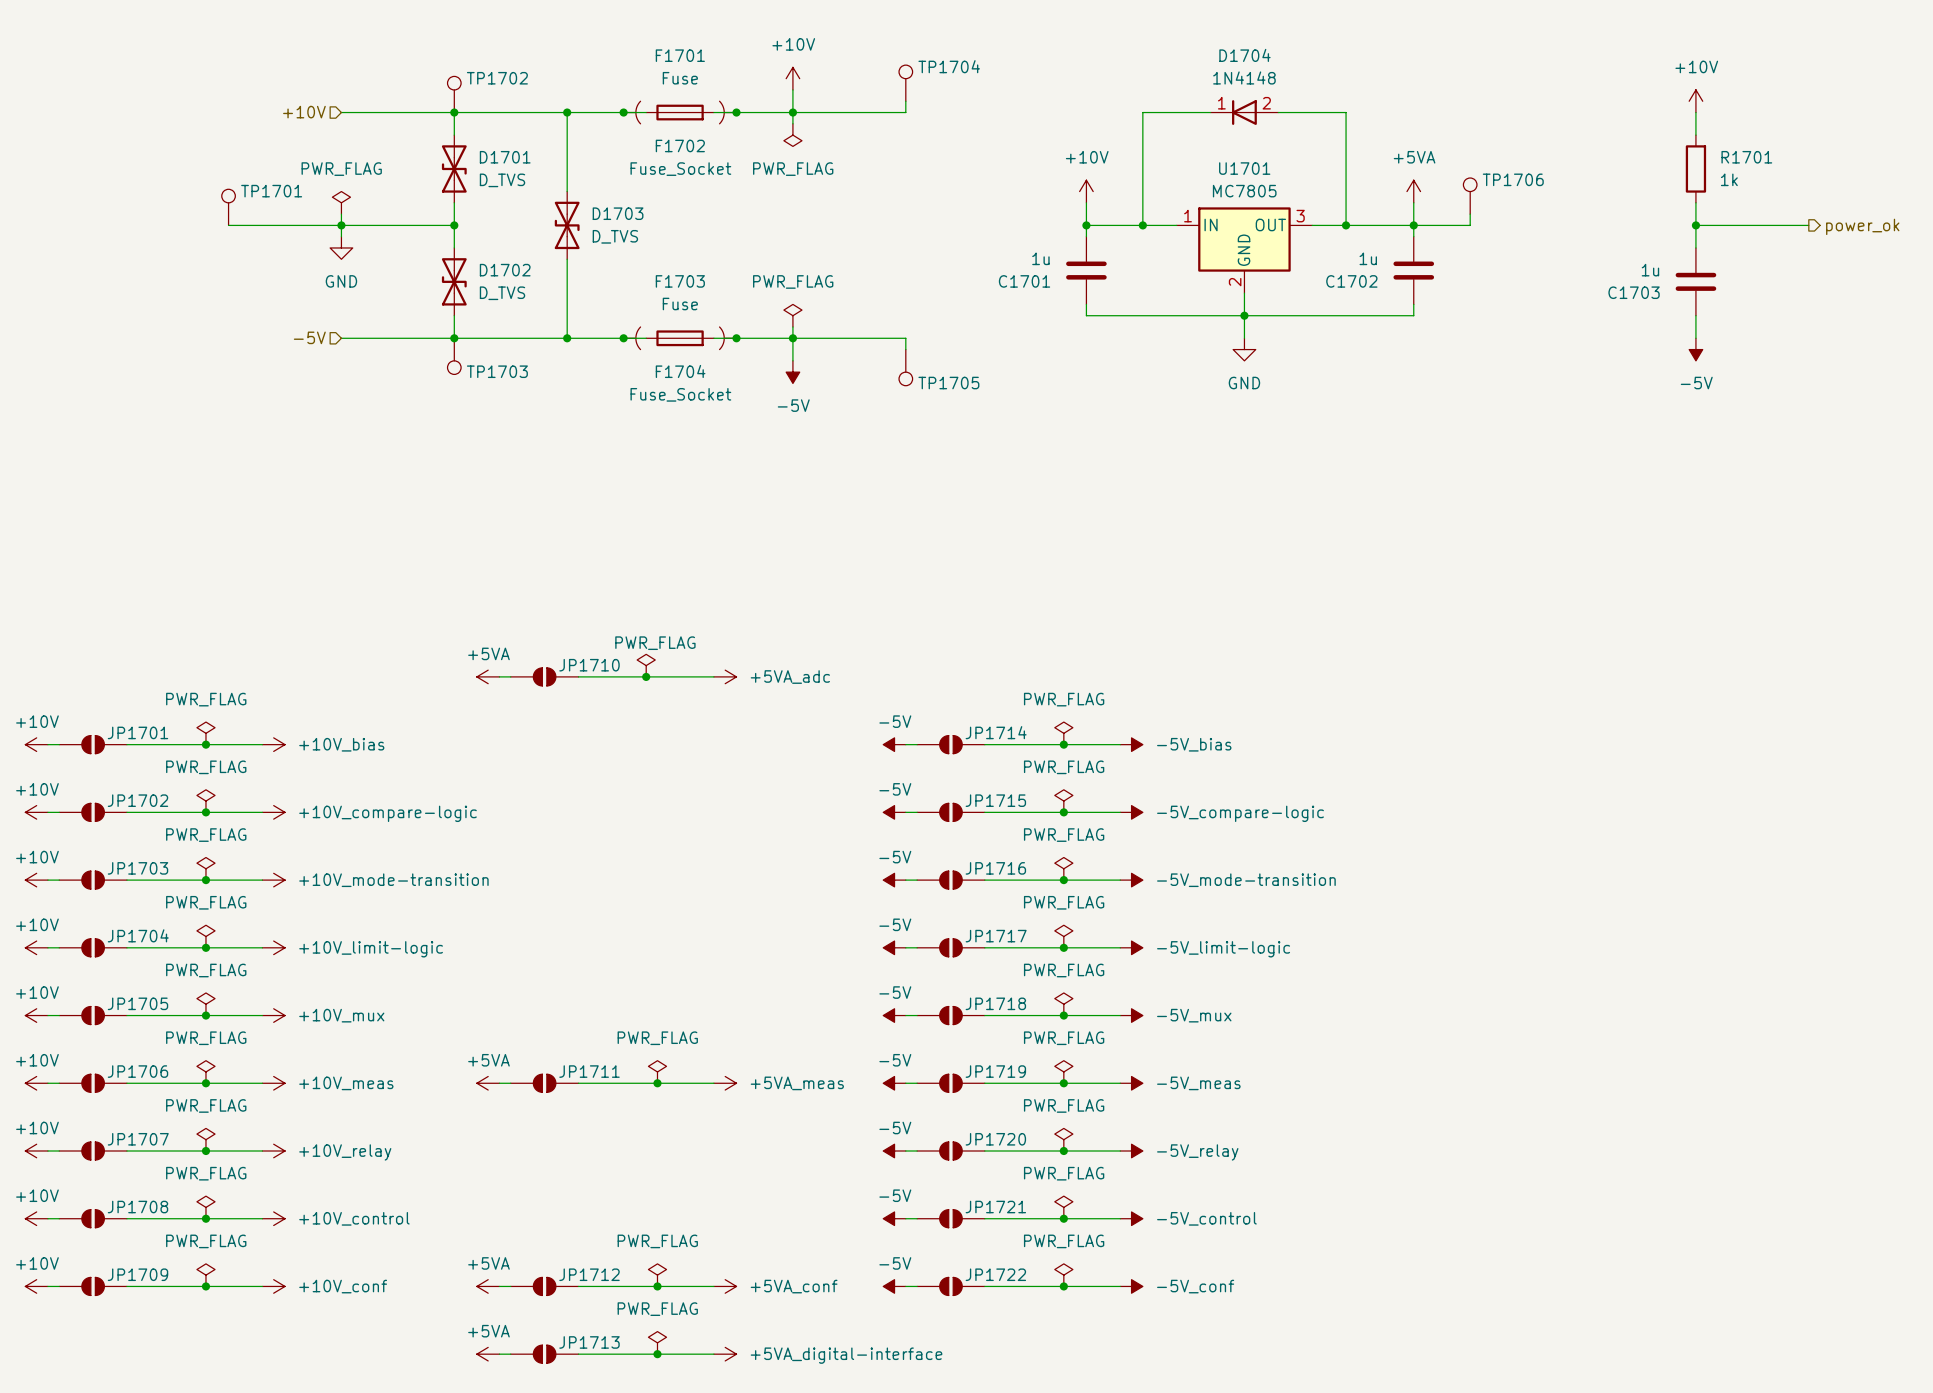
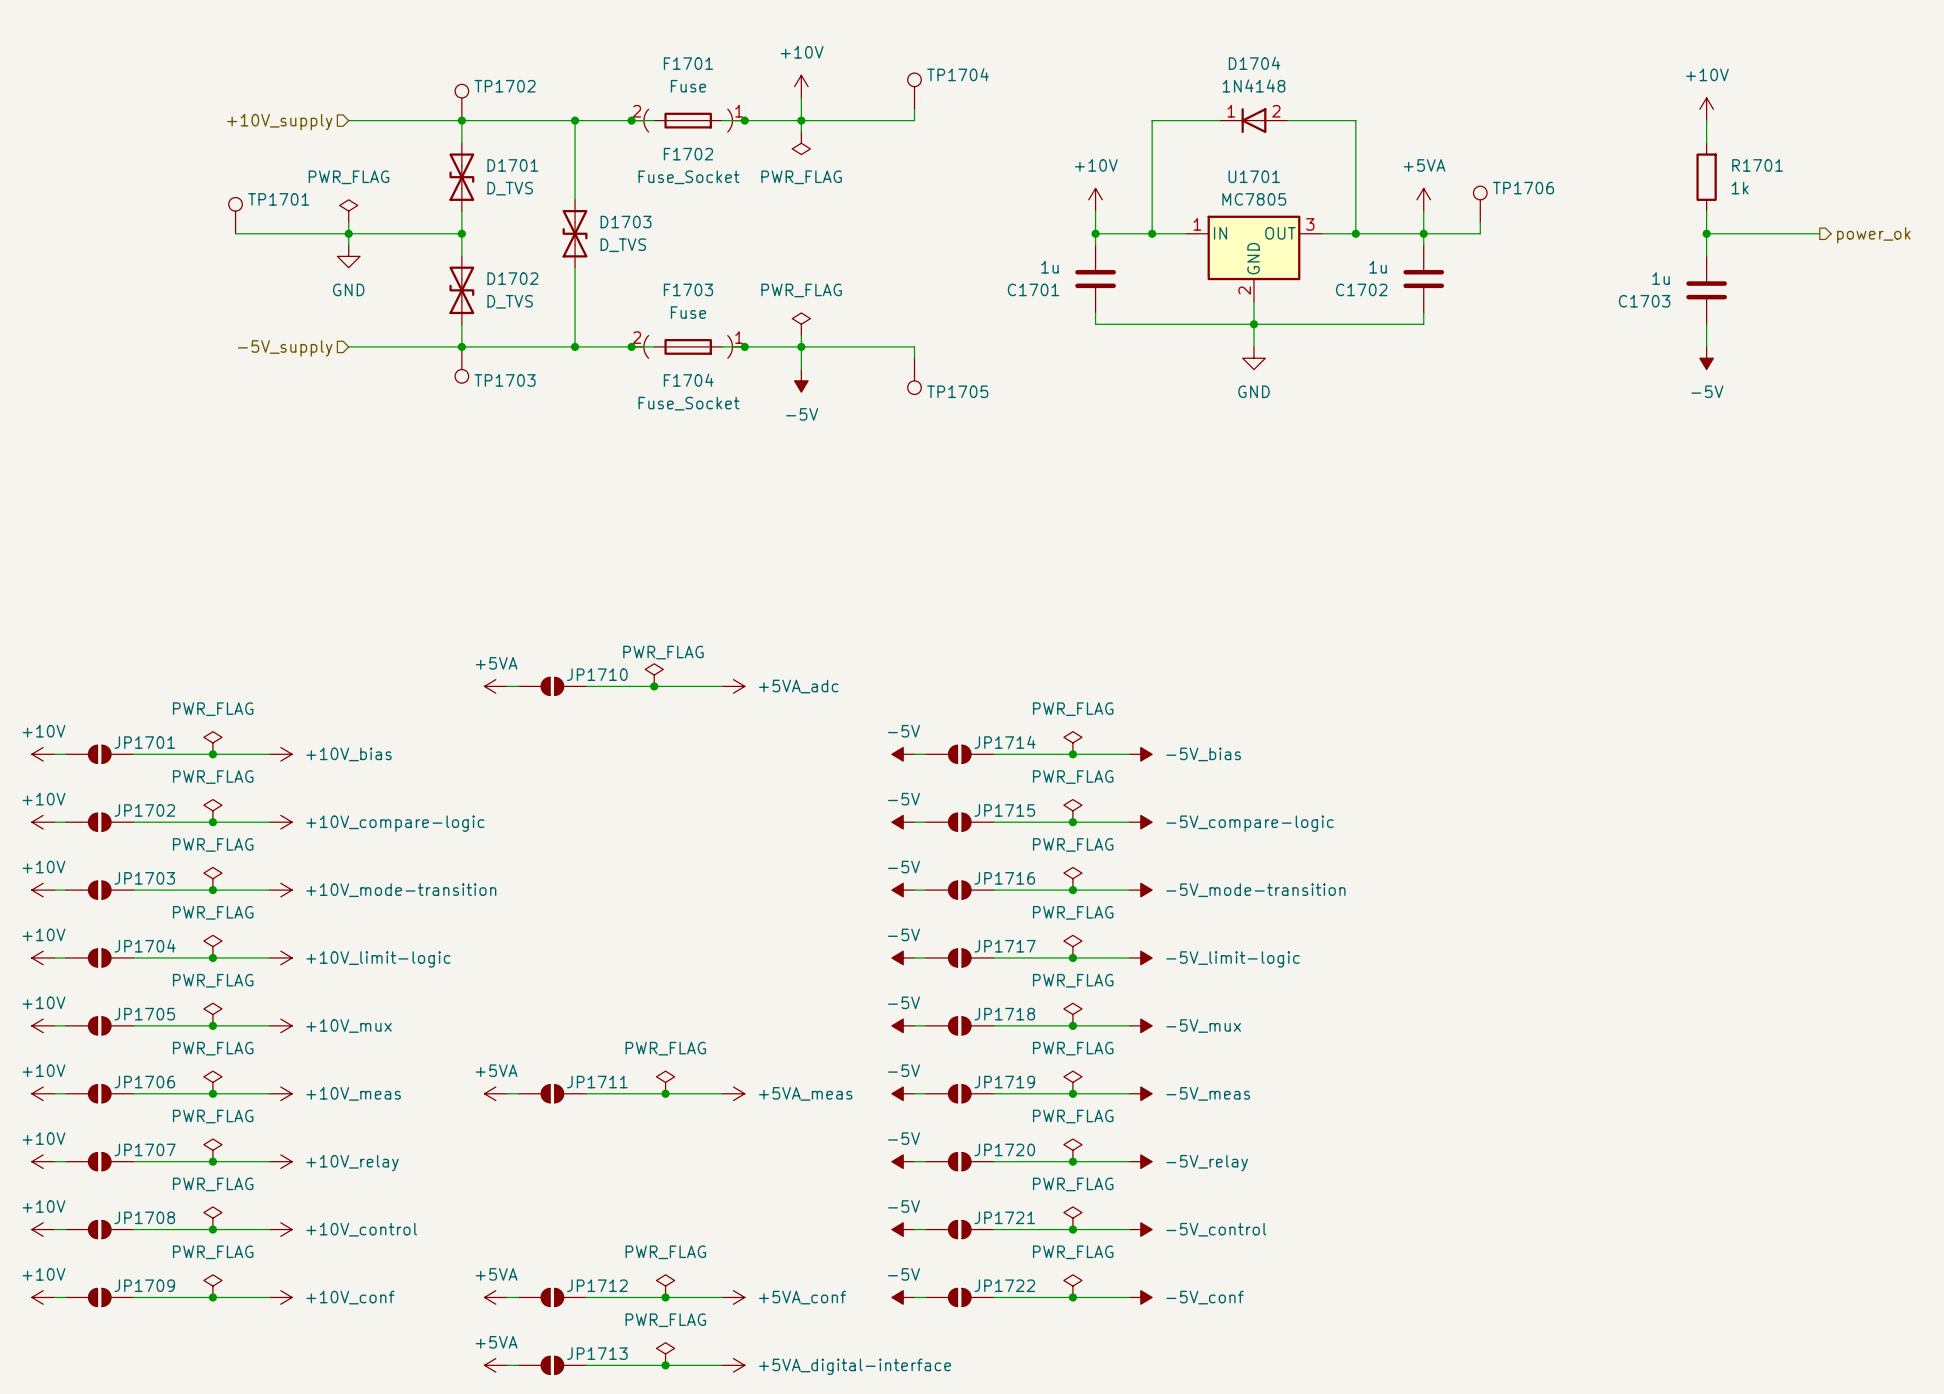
F1702 pin number: none -> 2 (637, 111)
F1702 pin number: none -> 1 (739, 111)
hierarchical label: +10V (304, 112) -> +10V_supply (279, 122)
F1704 pin number: none -> 2 (637, 337)
F1704 pin number: none -> 1 (739, 337)
hierarchical label: -5V (309, 337) -> -5V_supply (285, 348)

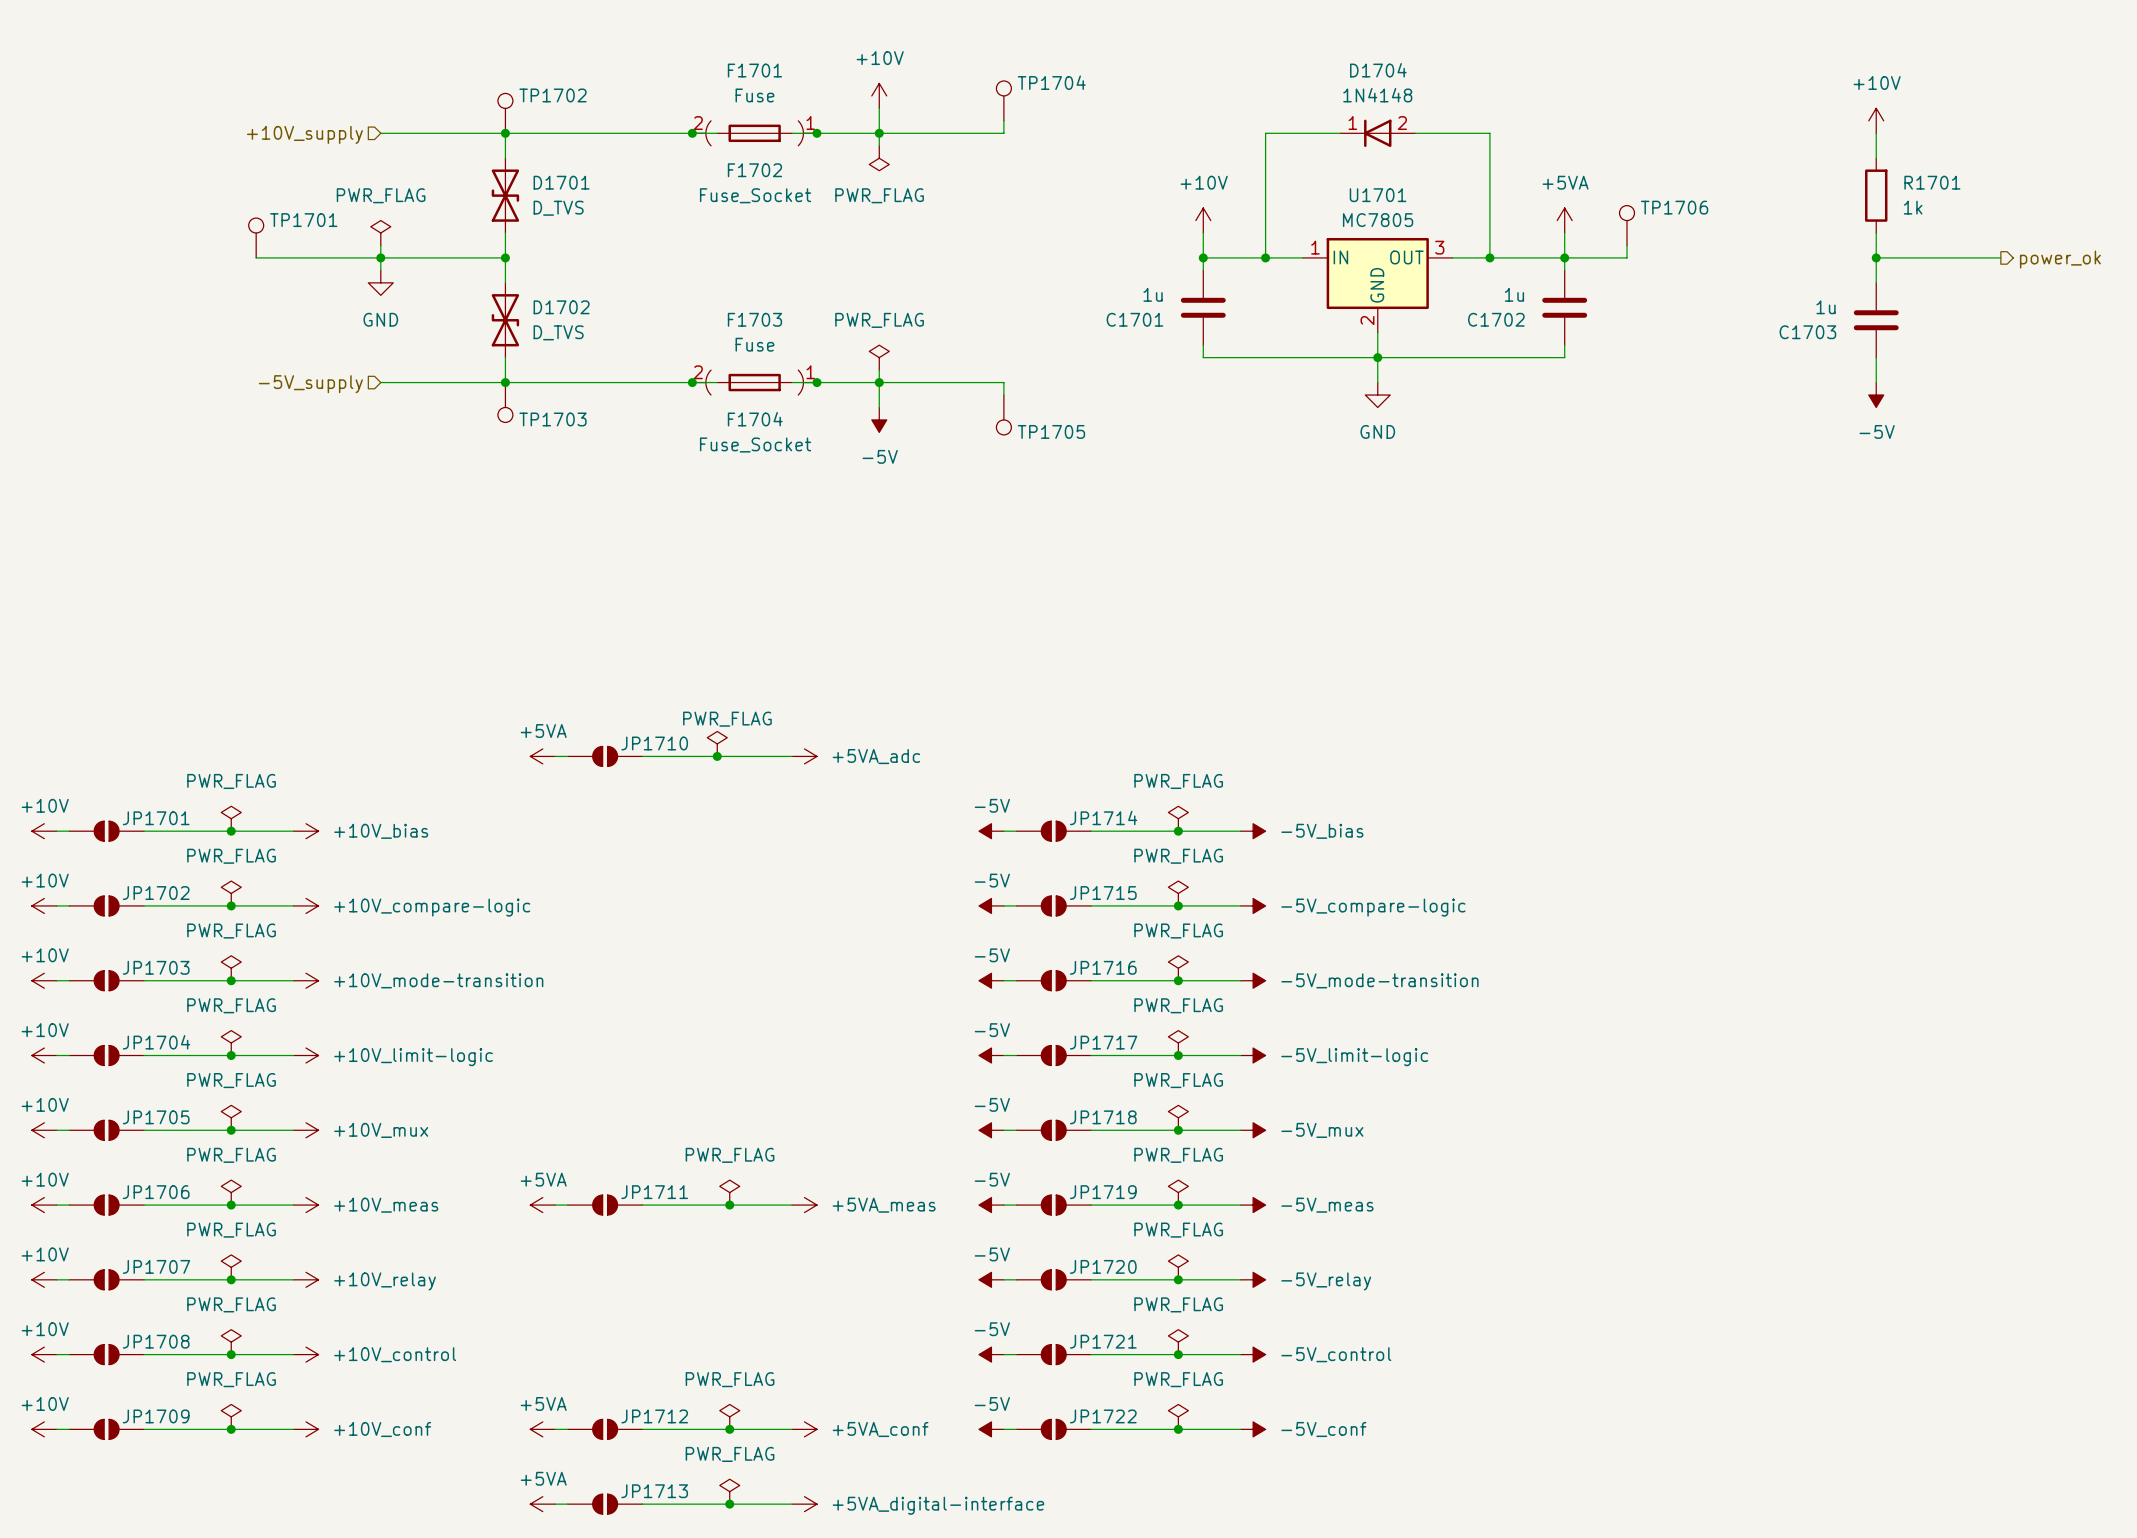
wire: (575, 120) (575, 199) -> none
junction: (575, 120) -> none
D1703: D_TVS (575, 233) -> none
wire: (575, 267) (575, 346) -> none
junction: (575, 346) -> none

